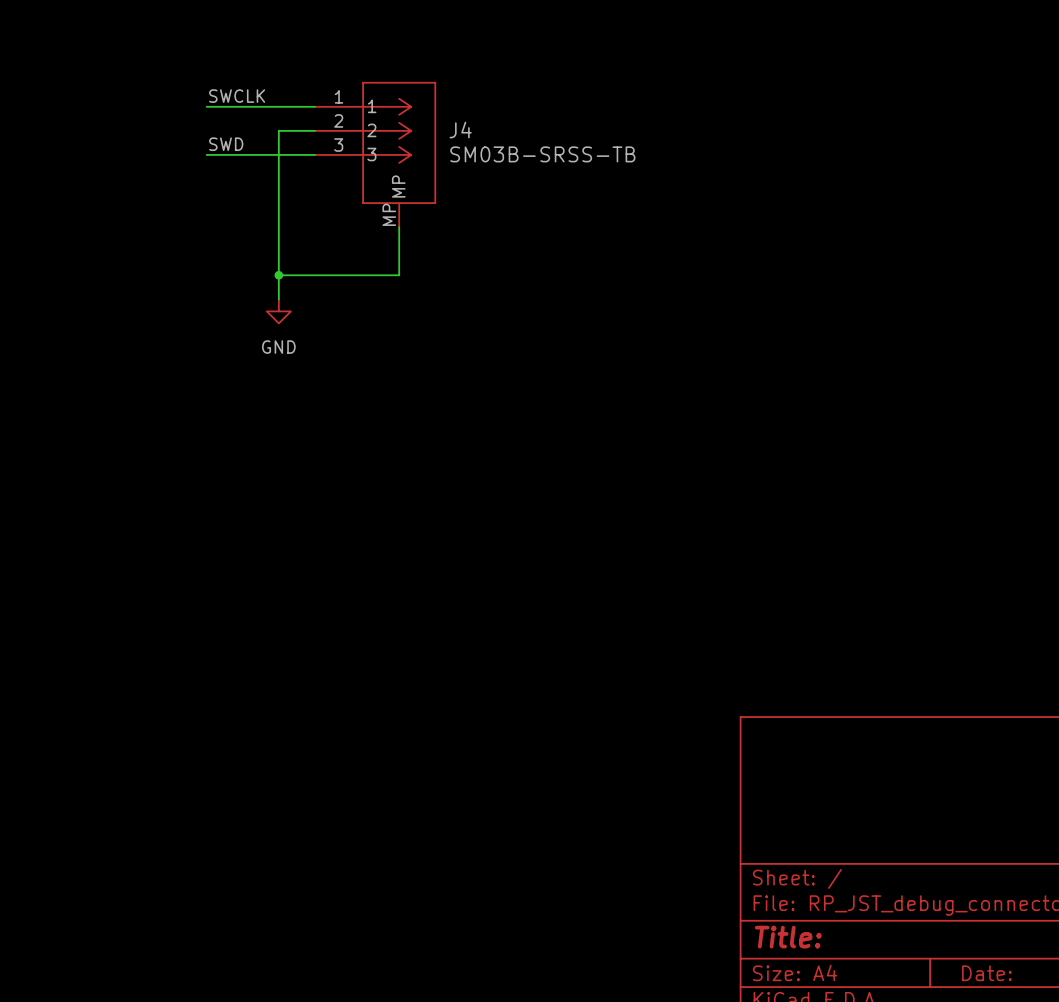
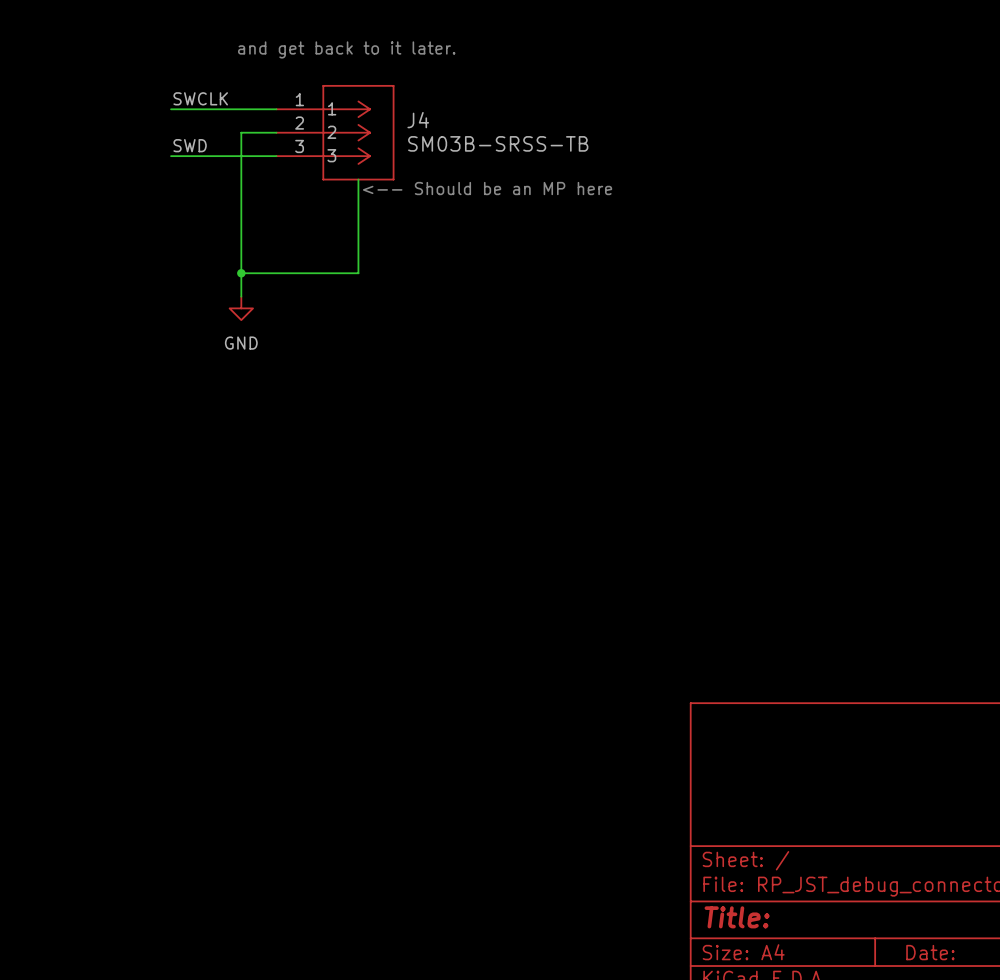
text: none -> and get back to it later. (346, 49)
J4 symbol: [314, 82, 436, 228] -> [276, 85, 395, 181]
text: none -> <-- Should be an MP here (487, 188)

